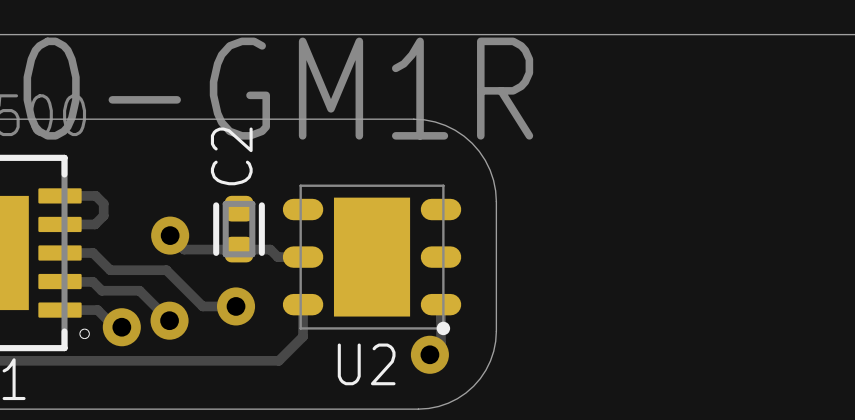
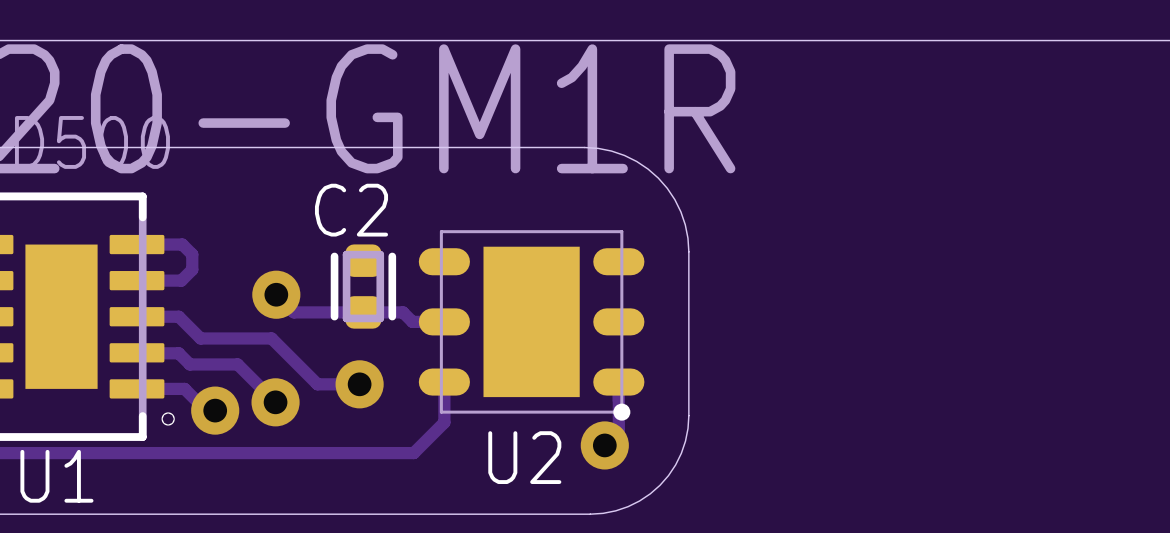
C2 name rotation: 0° (231, 156) -> 90° clockwise (351, 210)

